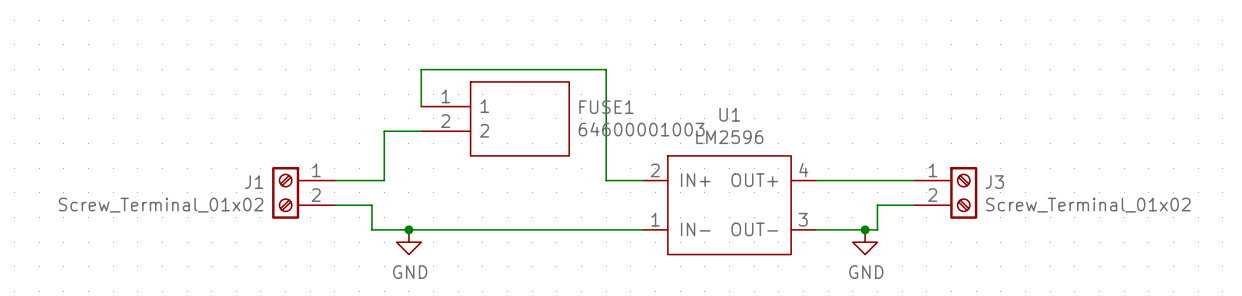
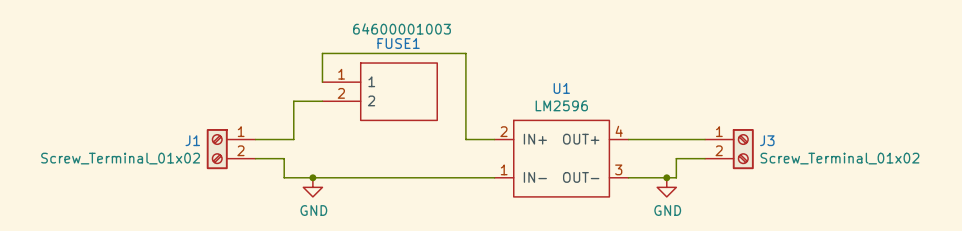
FUSE1 name position: FUSE1 (606, 107) -> FUSE1 (398, 43)
FUSE1 value position: 64600001003 (641, 129) -> 64600001003 (402, 28)

